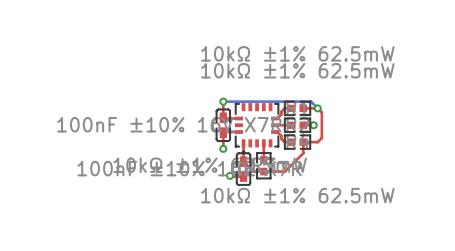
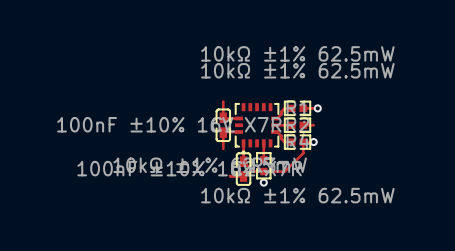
bottom track: (223, 101) (311, 101) (317, 108) -> none
via: (223, 101) -> none
top track: (313, 108) (317, 108) (321, 112) (321, 138) (317, 142) (313, 142) -> none
via position: (313, 125) -> (313, 142)
via: (223, 148) -> none
via: (230, 175) -> none
via: none -> (263, 182)

